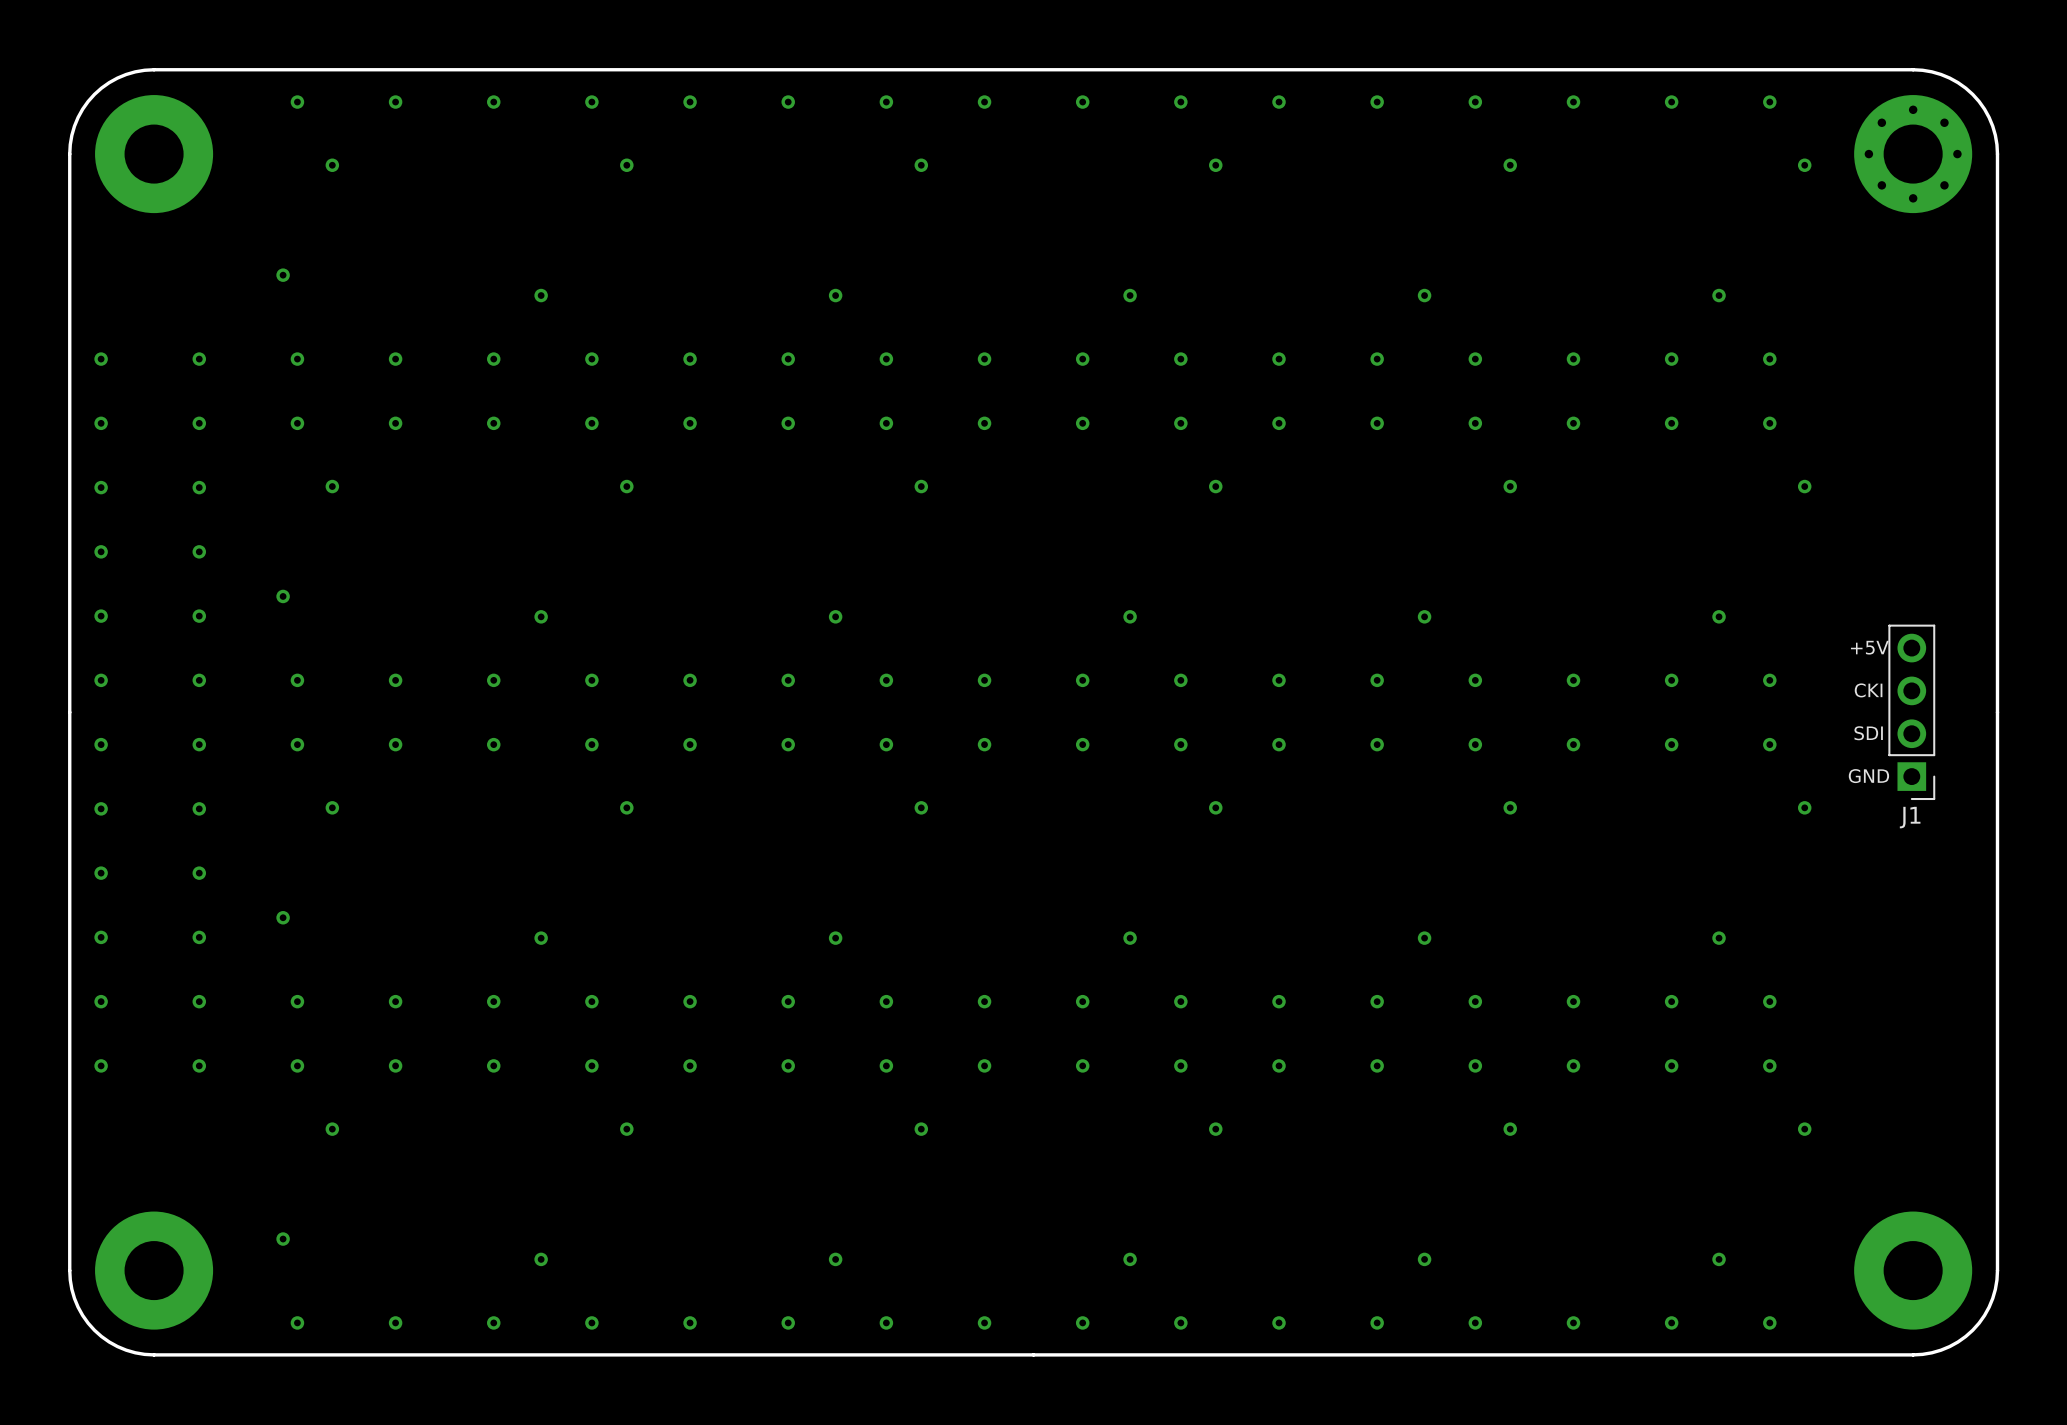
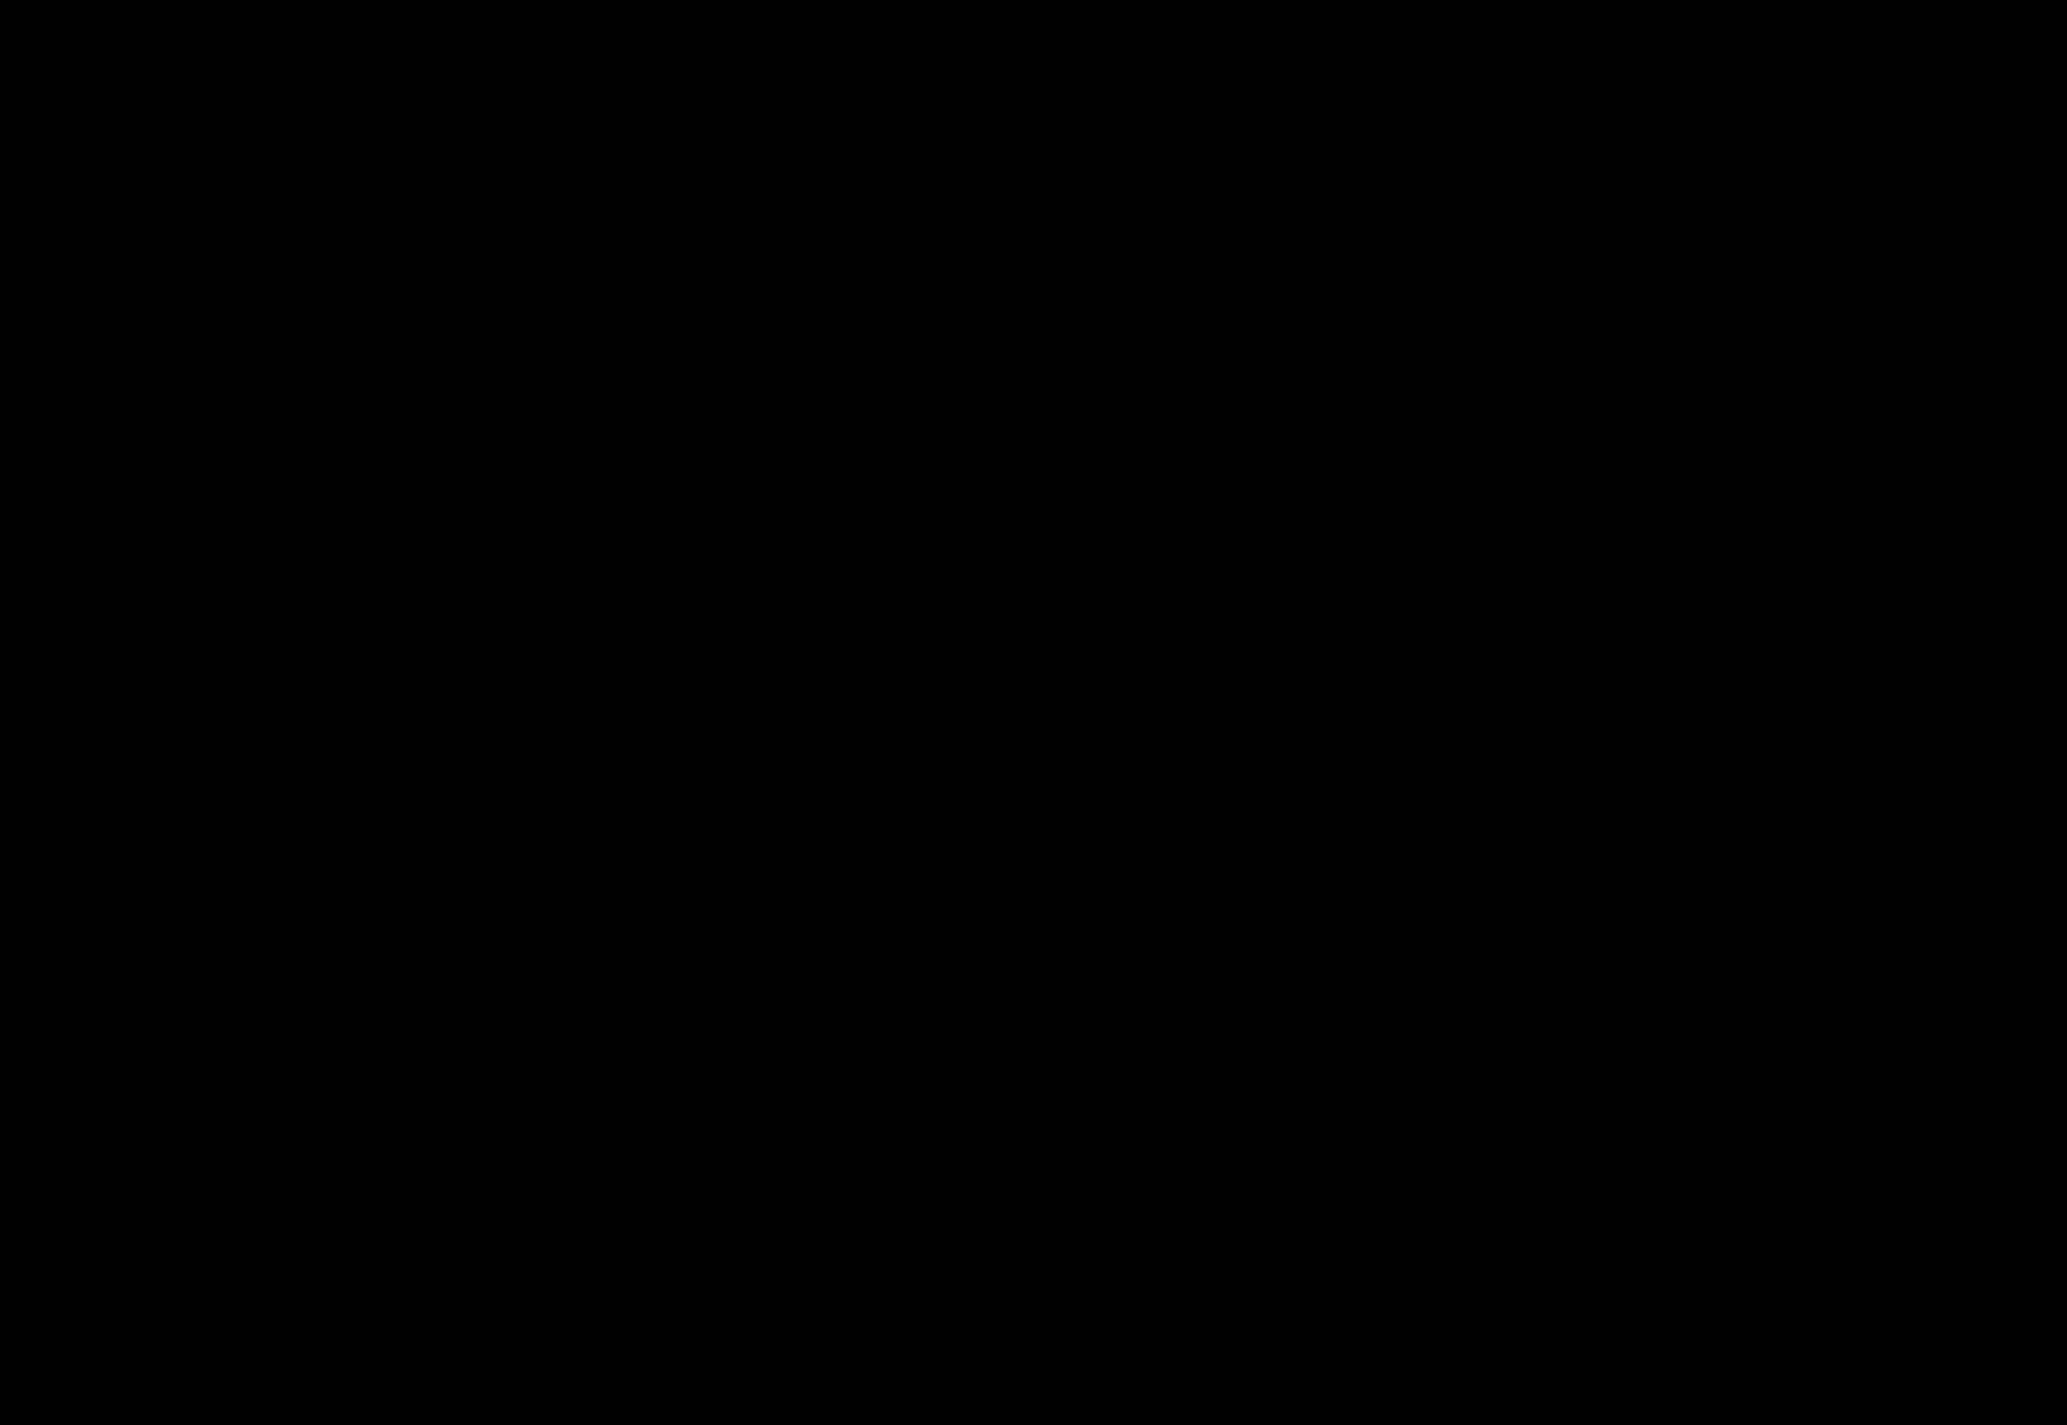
board edge: (1913, 69) (154, 69) (126, 74) (109, 82) (94, 94) (78, 117) (71, 135) (69, 154) (69, 1270) (71, 1289) (82, 1315) (101, 1336) (117, 1346) (135, 1352) (154, 1354) (1913, 1354) (1941, 1350) (1958, 1341) (1972, 1330) (1984, 1315) (1992, 1298) (1997, 1270) (1997, 154) (1992, 126) (1984, 109) (1972, 94) (1958, 82) (1941, 74) (1913, 69) -> none
via: (297, 102) -> none
via: (395, 102) -> none
via: (493, 102) -> none
via: (591, 102) -> none
via: (690, 102) -> none
via: (788, 102) -> none
via: (886, 102) -> none
via: (984, 102) -> none
via: (1082, 102) -> none
via: (1180, 102) -> none
via: (1279, 102) -> none
via: (1377, 102) -> none
via: (1475, 102) -> none
via: (1573, 102) -> none
via: (1671, 102) -> none
via: (1769, 102) -> none
part: (154, 154) -> none
part: (1913, 154) -> none
via: (332, 165) -> none
via: (626, 165) -> none
via: (921, 165) -> none
via: (1215, 165) -> none
via: (1510, 165) -> none
via: (1804, 165) -> none
via: (283, 275) -> none
via: (541, 295) -> none
via: (835, 295) -> none
via: (1130, 295) -> none
via: (1424, 295) -> none
via: (1719, 295) -> none
via: (101, 359) -> none
via: (199, 359) -> none
via: (297, 359) -> none
via: (395, 359) -> none
via: (493, 359) -> none
via: (591, 359) -> none
via: (690, 359) -> none
via: (788, 359) -> none
via: (886, 359) -> none
via: (984, 359) -> none
via: (1082, 359) -> none
via: (1180, 359) -> none
via: (1279, 359) -> none
via: (1377, 359) -> none
via: (1475, 359) -> none
via: (1573, 359) -> none
via: (1671, 359) -> none
via: (1769, 359) -> none
via: (101, 423) -> none
via: (199, 423) -> none
via: (297, 423) -> none
via: (395, 423) -> none
via: (493, 423) -> none
via: (591, 423) -> none
via: (690, 423) -> none
via: (788, 423) -> none
via: (886, 423) -> none
via: (984, 423) -> none
via: (1082, 423) -> none
via: (1180, 423) -> none
via: (1279, 423) -> none
via: (1377, 423) -> none
via: (1475, 423) -> none
via: (1573, 423) -> none
via: (1671, 423) -> none
via: (1769, 423) -> none
via: (332, 486) -> none
via: (626, 486) -> none
via: (921, 486) -> none
via: (1215, 486) -> none
via: (1510, 486) -> none
via: (1804, 486) -> none
via: (101, 487) -> none
via: (199, 487) -> none
via: (101, 551) -> none
via: (199, 551) -> none
via: (283, 596) -> none
via: (101, 616) -> none
via: (199, 616) -> none
via: (541, 616) -> none
via: (835, 616) -> none
via: (1130, 616) -> none
via: (1424, 616) -> none
via: (1719, 616) -> none
text: +5V (1869, 647) -> none
via: (101, 680) -> none
via: (199, 680) -> none
via: (297, 680) -> none
via: (395, 680) -> none
via: (493, 680) -> none
via: (591, 680) -> none
via: (690, 680) -> none
via: (788, 680) -> none
via: (886, 680) -> none
via: (984, 680) -> none
via: (1082, 680) -> none
via: (1180, 680) -> none
via: (1279, 680) -> none
via: (1377, 680) -> none
via: (1475, 680) -> none
via: (1573, 680) -> none
via: (1671, 680) -> none
via: (1769, 680) -> none
text: CKI (1868, 690) -> none
J1: (1911, 712) -> none
text: SDI (1868, 733) -> none
via: (101, 744) -> none
via: (199, 744) -> none
via: (297, 744) -> none
via: (395, 744) -> none
via: (493, 744) -> none
via: (591, 744) -> none
via: (690, 744) -> none
via: (788, 744) -> none
via: (886, 744) -> none
via: (984, 744) -> none
via: (1082, 744) -> none
via: (1180, 744) -> none
via: (1279, 744) -> none
via: (1377, 744) -> none
via: (1475, 744) -> none
via: (1573, 744) -> none
via: (1671, 744) -> none
via: (1769, 744) -> none
text: GND (1868, 776) -> none
via: (332, 807) -> none
via: (626, 807) -> none
via: (921, 807) -> none
via: (1215, 807) -> none
via: (1510, 807) -> none
via: (1804, 807) -> none
via: (101, 808) -> none
via: (199, 808) -> none
via: (101, 873) -> none
via: (199, 873) -> none
via: (283, 917) -> none
via: (101, 937) -> none
via: (199, 937) -> none
via: (541, 938) -> none
via: (835, 938) -> none
via: (1130, 938) -> none
via: (1424, 938) -> none
via: (1719, 938) -> none
via: (101, 1001) -> none
via: (199, 1001) -> none
via: (297, 1001) -> none
via: (395, 1001) -> none
via: (493, 1001) -> none
via: (591, 1001) -> none
via: (690, 1001) -> none
via: (788, 1001) -> none
via: (886, 1001) -> none
via: (984, 1001) -> none
via: (1082, 1001) -> none
via: (1180, 1001) -> none
via: (1279, 1001) -> none
via: (1377, 1001) -> none
via: (1475, 1001) -> none
via: (1573, 1001) -> none
via: (1671, 1001) -> none
via: (1769, 1001) -> none
via: (101, 1065) -> none
via: (199, 1065) -> none
via: (297, 1065) -> none
via: (395, 1065) -> none
via: (493, 1065) -> none
via: (591, 1065) -> none
via: (690, 1065) -> none
via: (788, 1065) -> none
via: (886, 1065) -> none
via: (984, 1065) -> none
via: (1082, 1065) -> none
via: (1180, 1065) -> none
via: (1279, 1065) -> none
via: (1377, 1065) -> none
via: (1475, 1065) -> none
via: (1573, 1065) -> none
via: (1671, 1065) -> none
via: (1769, 1065) -> none
via: (332, 1129) -> none
via: (626, 1129) -> none
via: (921, 1129) -> none
via: (1215, 1129) -> none
via: (1510, 1129) -> none
via: (1804, 1129) -> none
via: (283, 1239) -> none
via: (541, 1259) -> none
via: (835, 1259) -> none
via: (1130, 1259) -> none
via: (1424, 1259) -> none
via: (1719, 1259) -> none
part: (154, 1270) -> none
part: (1913, 1270) -> none
via: (297, 1322) -> none
via: (395, 1322) -> none
via: (493, 1322) -> none
via: (591, 1322) -> none
via: (690, 1322) -> none
via: (788, 1322) -> none
via: (886, 1322) -> none
via: (984, 1322) -> none
via: (1082, 1322) -> none
via: (1180, 1322) -> none
via: (1279, 1322) -> none
via: (1377, 1322) -> none
via: (1475, 1322) -> none
via: (1573, 1322) -> none
via: (1671, 1322) -> none
via: (1769, 1322) -> none

